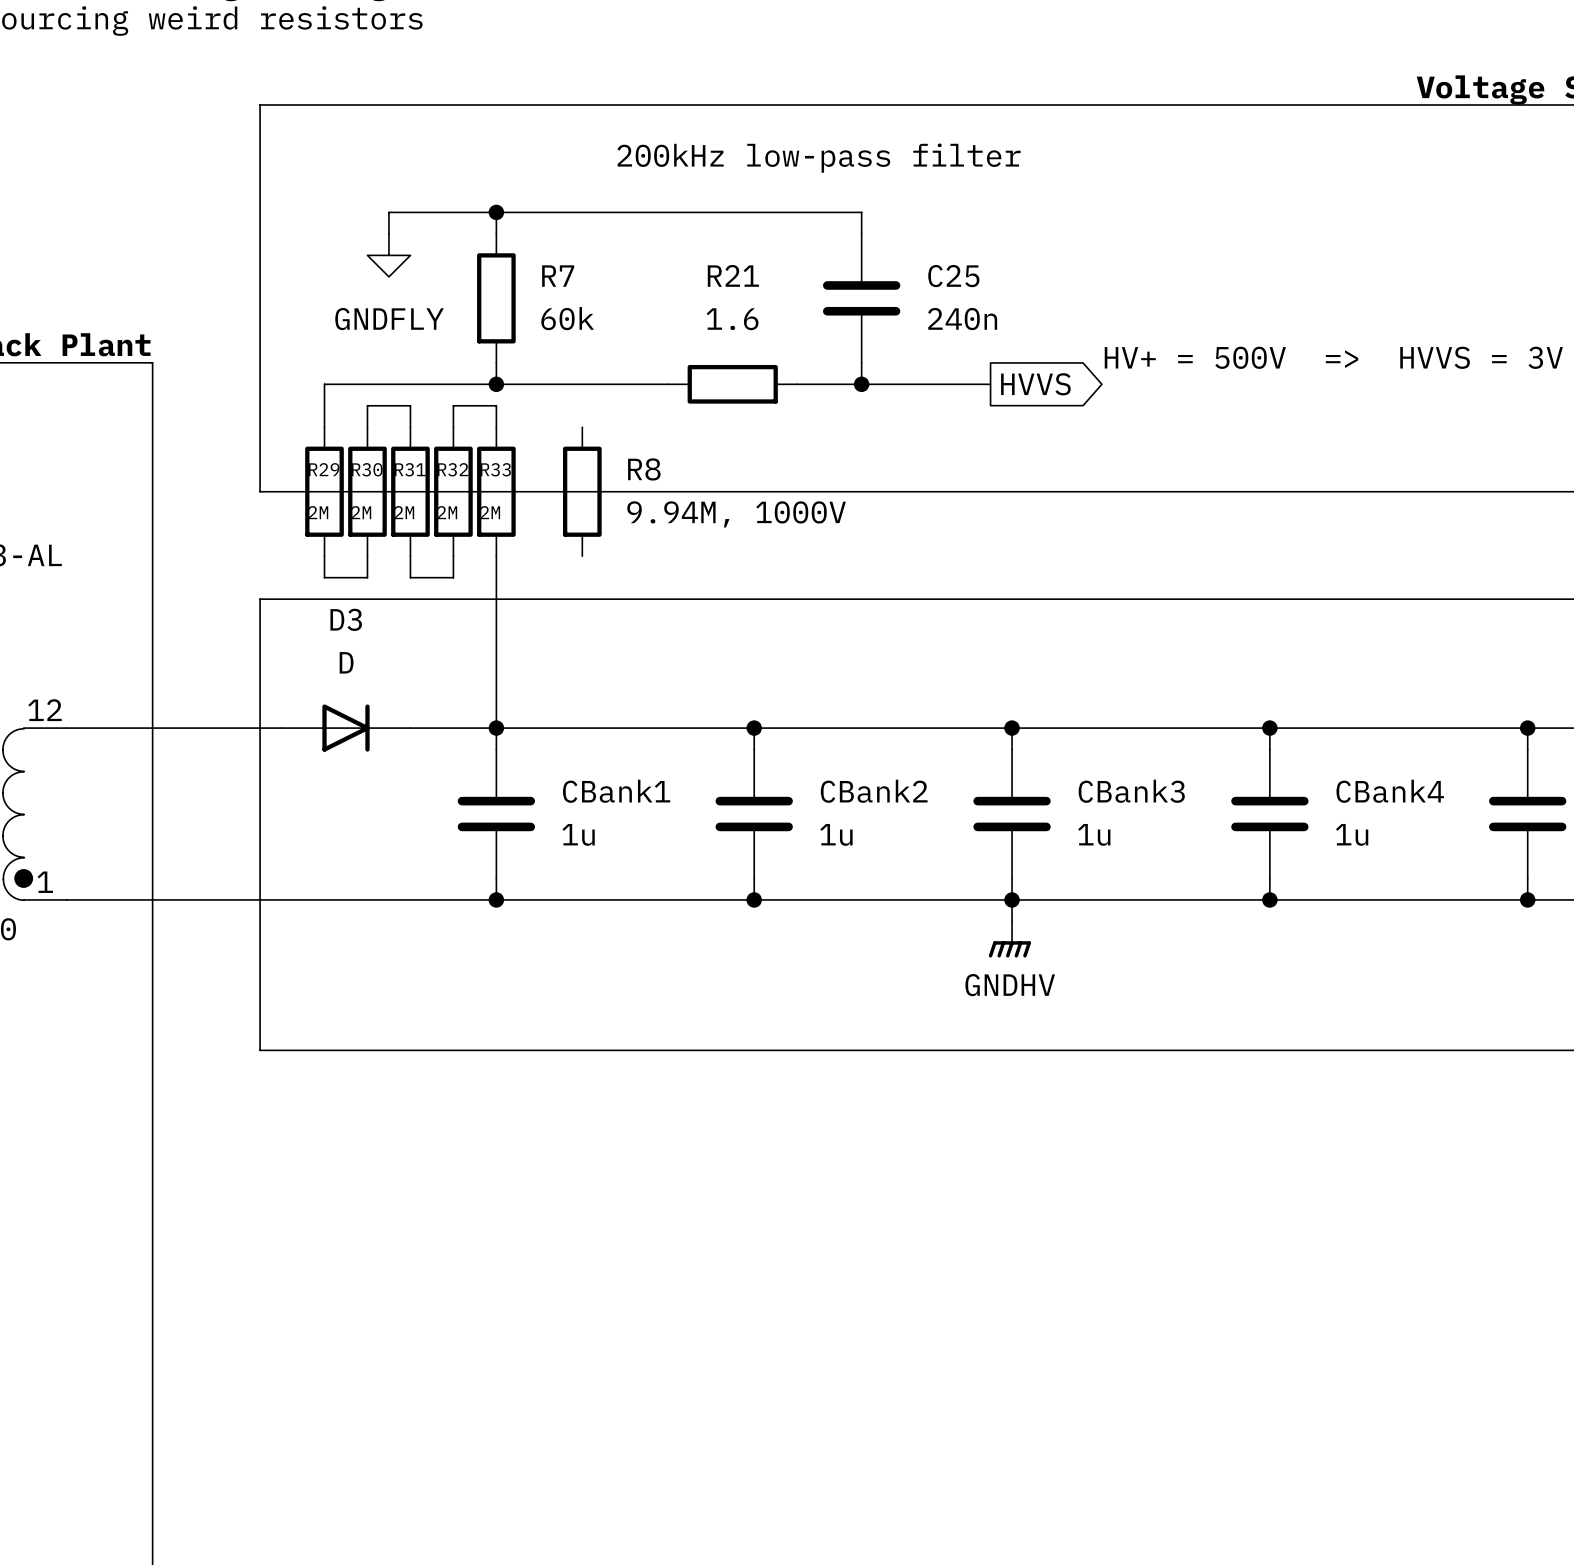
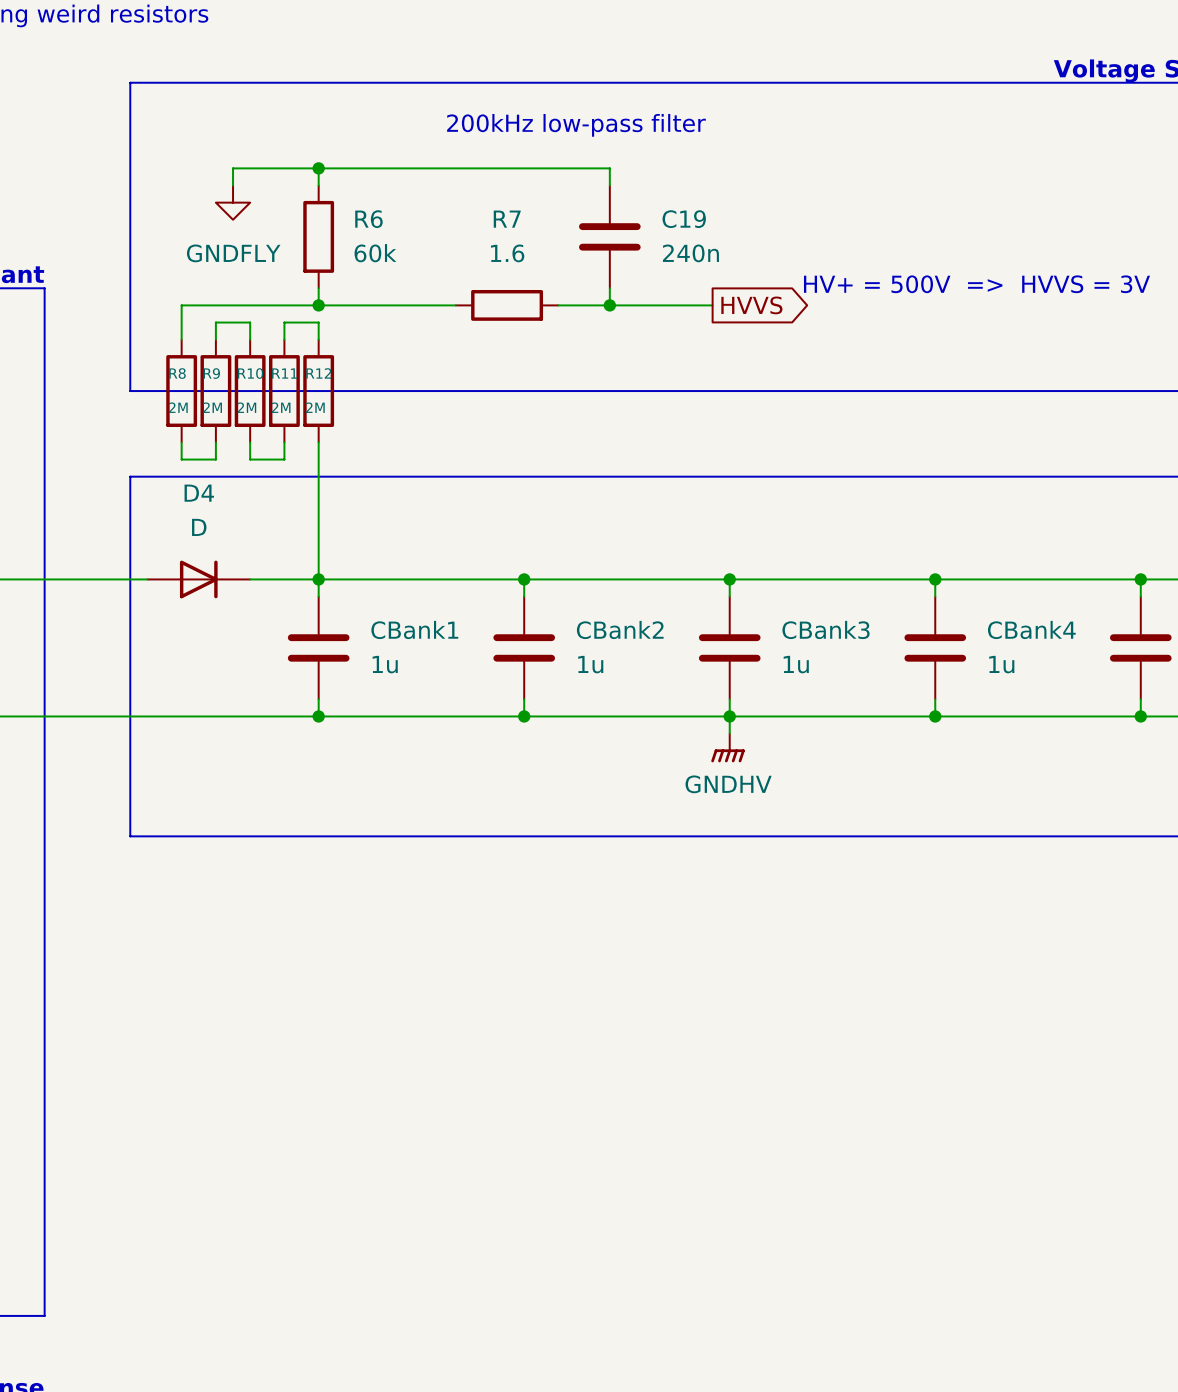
R21 name: R21 (733, 275) -> R7 (507, 219)
R7 name: R7 (558, 276) -> R6 (368, 219)
C25 name: C25 (953, 276) -> C19 (684, 219)
R29 name: R29 (324, 469) -> R8 (177, 373)
R30 name: R30 (367, 469) -> R9 (211, 373)
R31 name: R31 (410, 469) -> R10 (250, 373)
R32 name: R32 (453, 469) -> R11 (284, 373)
R33 name: R33 (495, 469) -> R12 (318, 373)
R8: 9.94M, 1000V (582, 491) -> none
D3 name: D3 (346, 619) -> D4 (199, 493)

